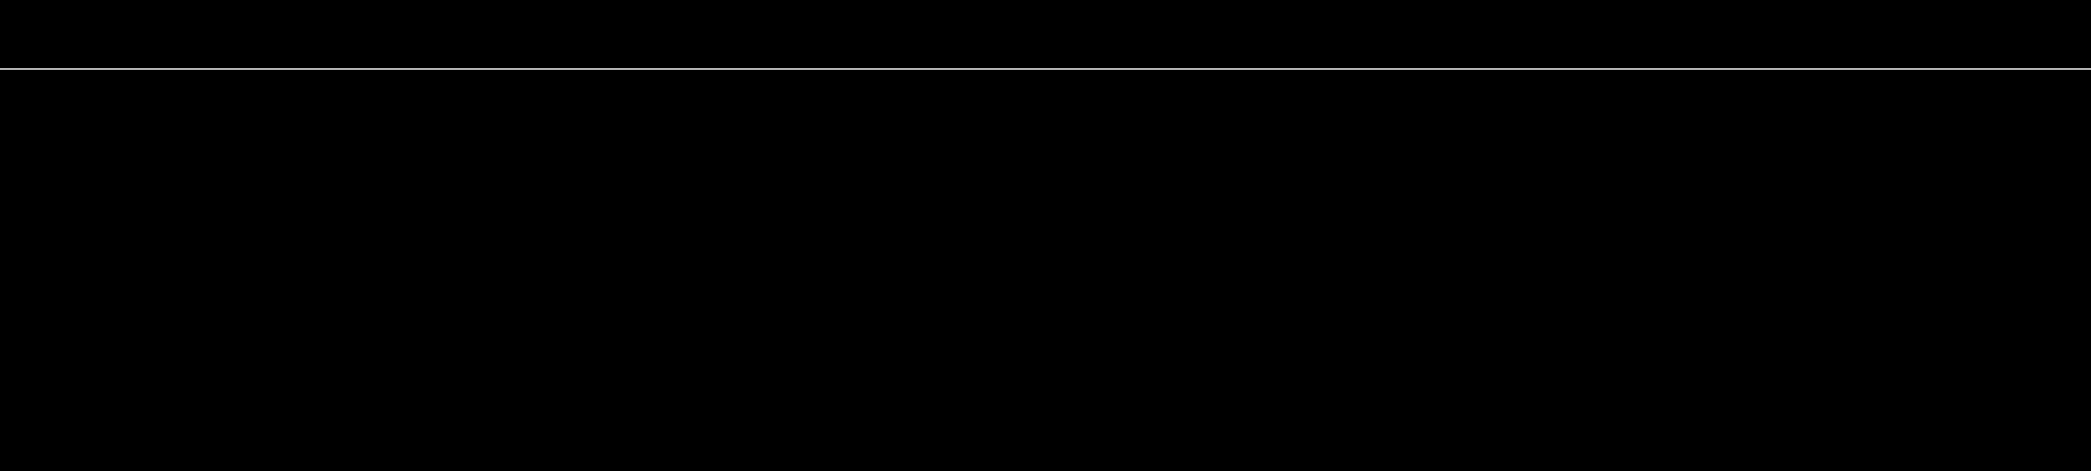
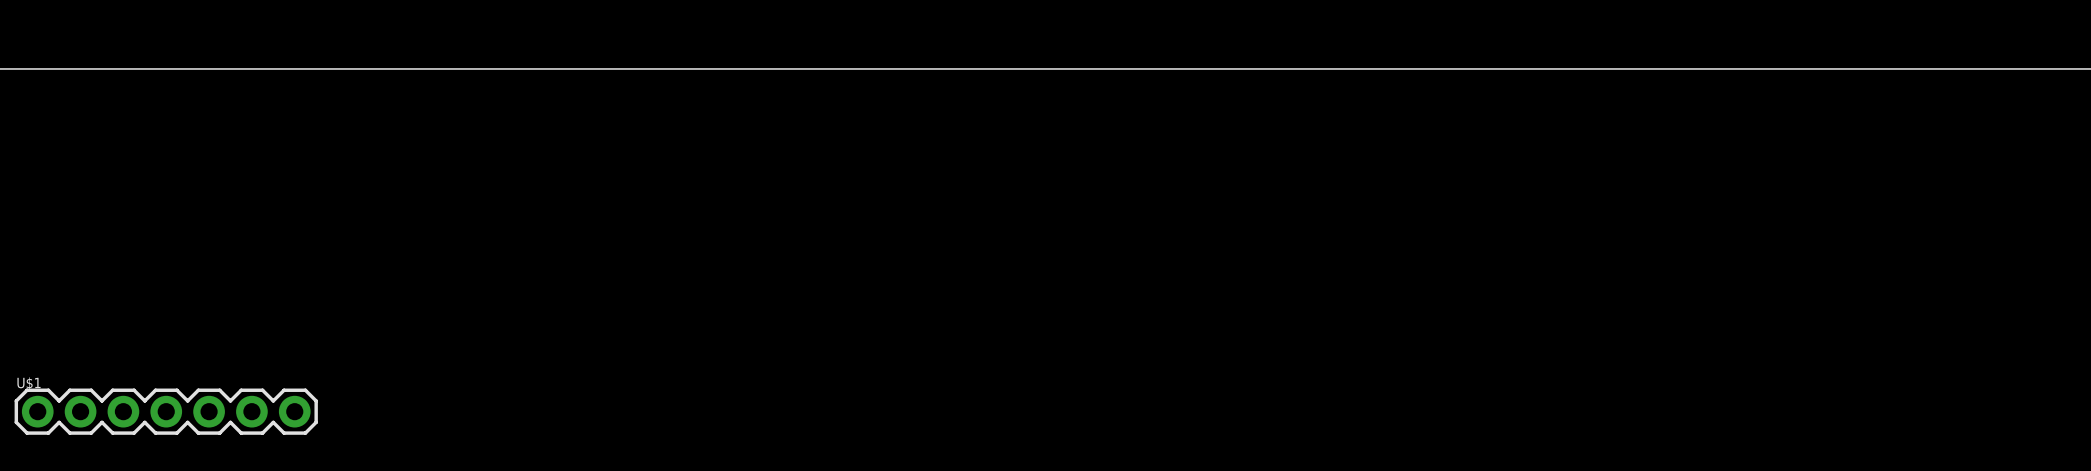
U$1: none -> (166, 411)

